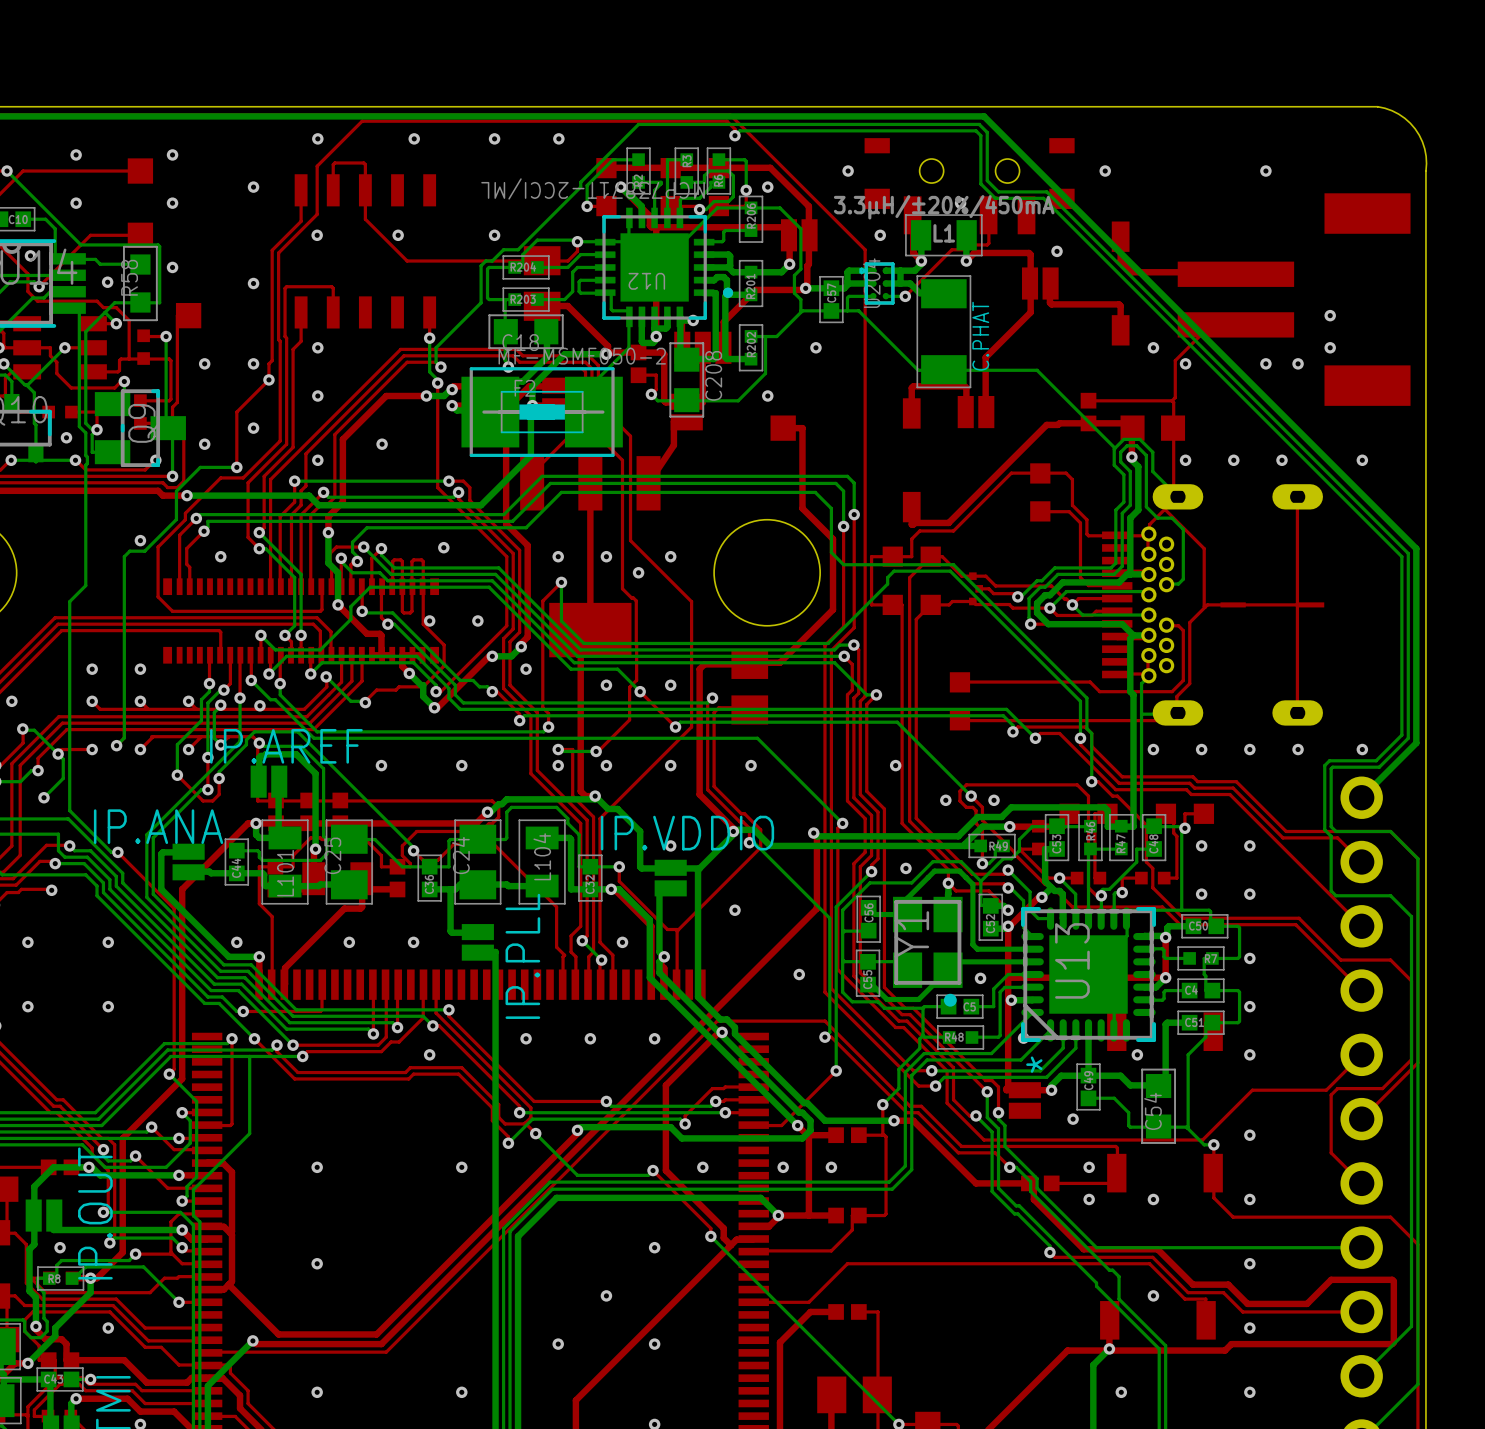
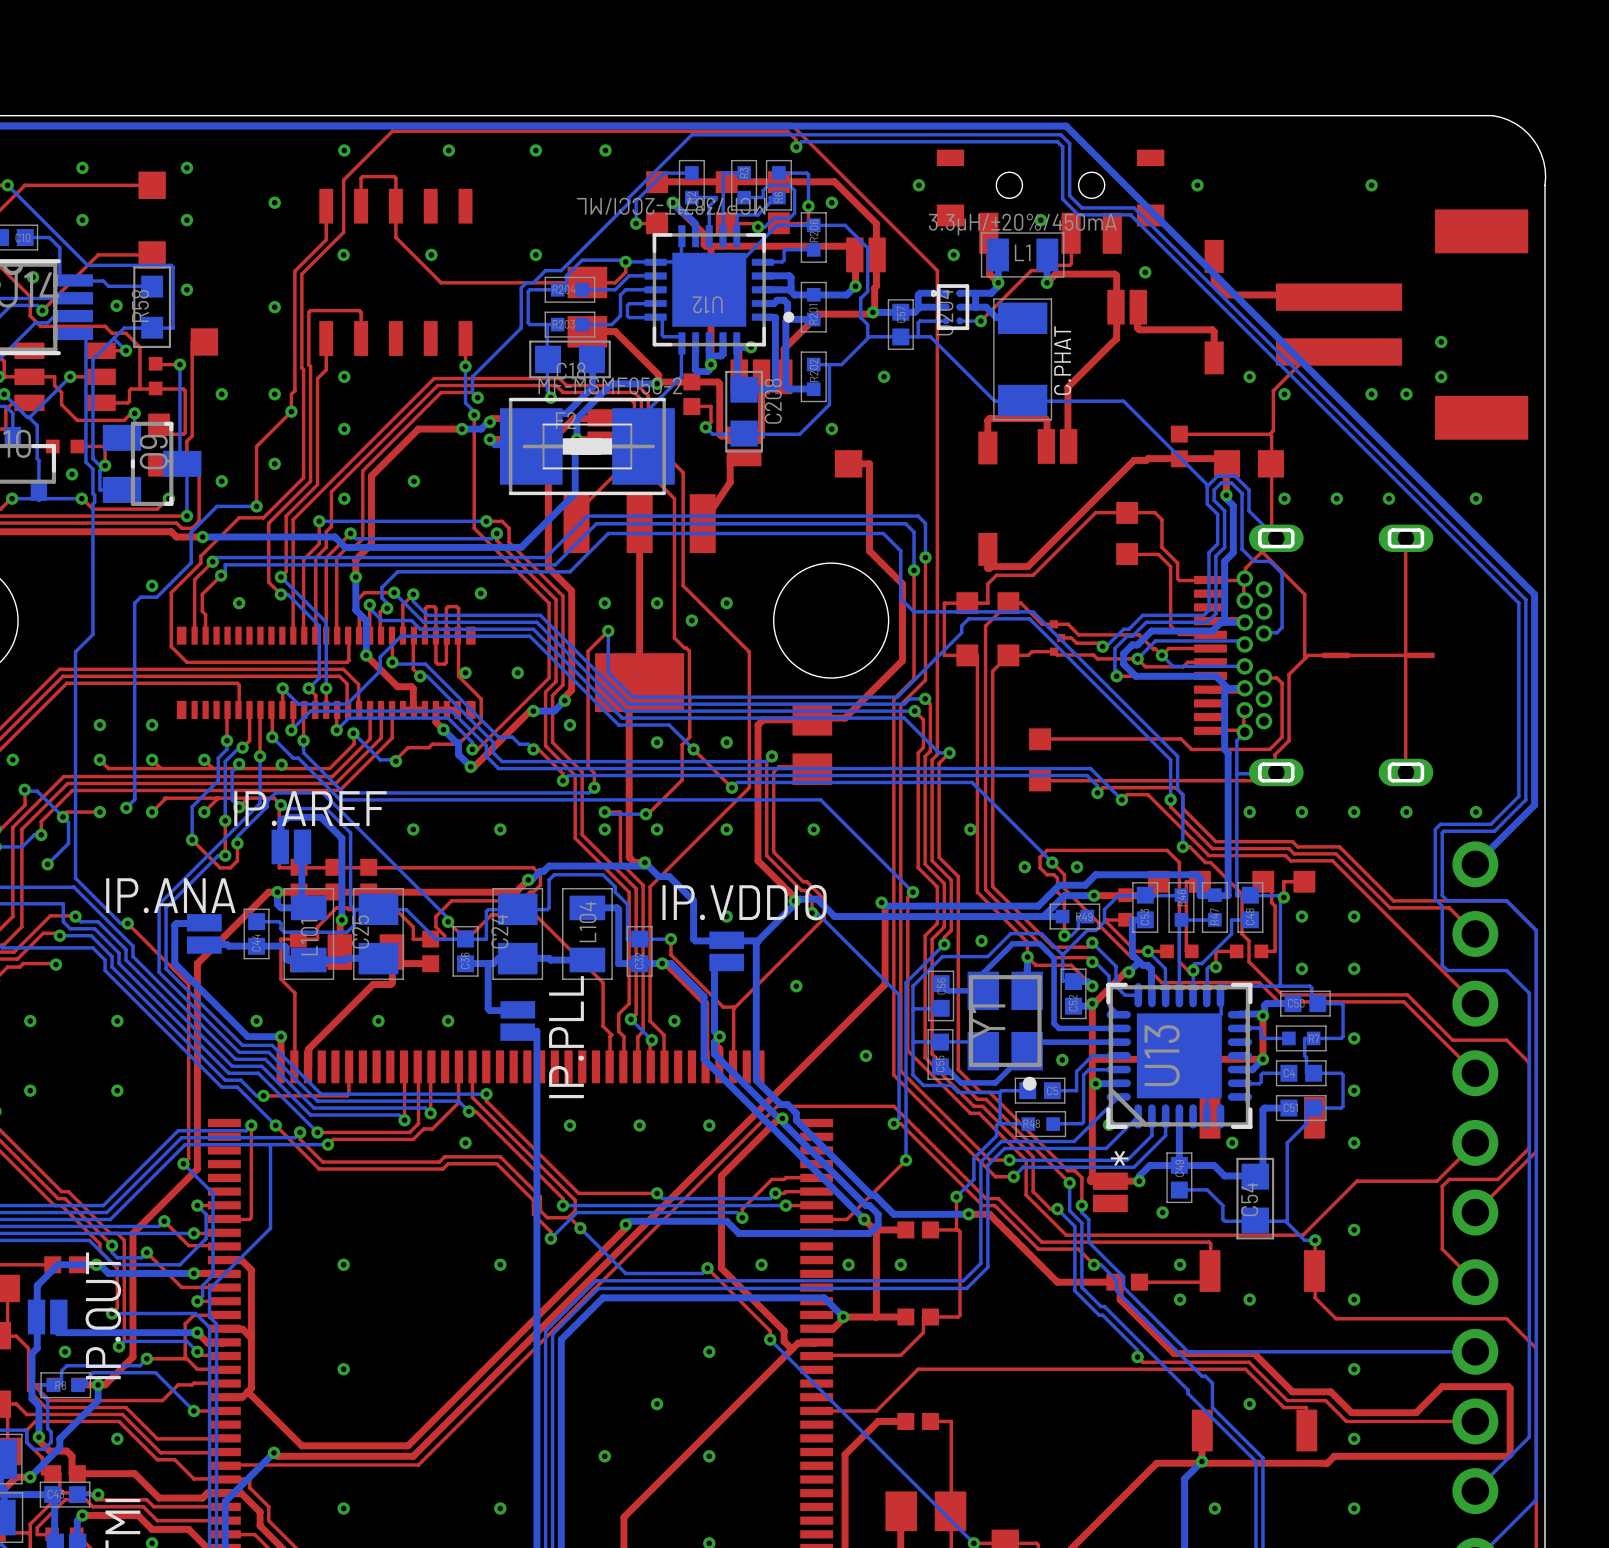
part footprint: [134, 394, 147, 430] -> [148, 413, 171, 477]

